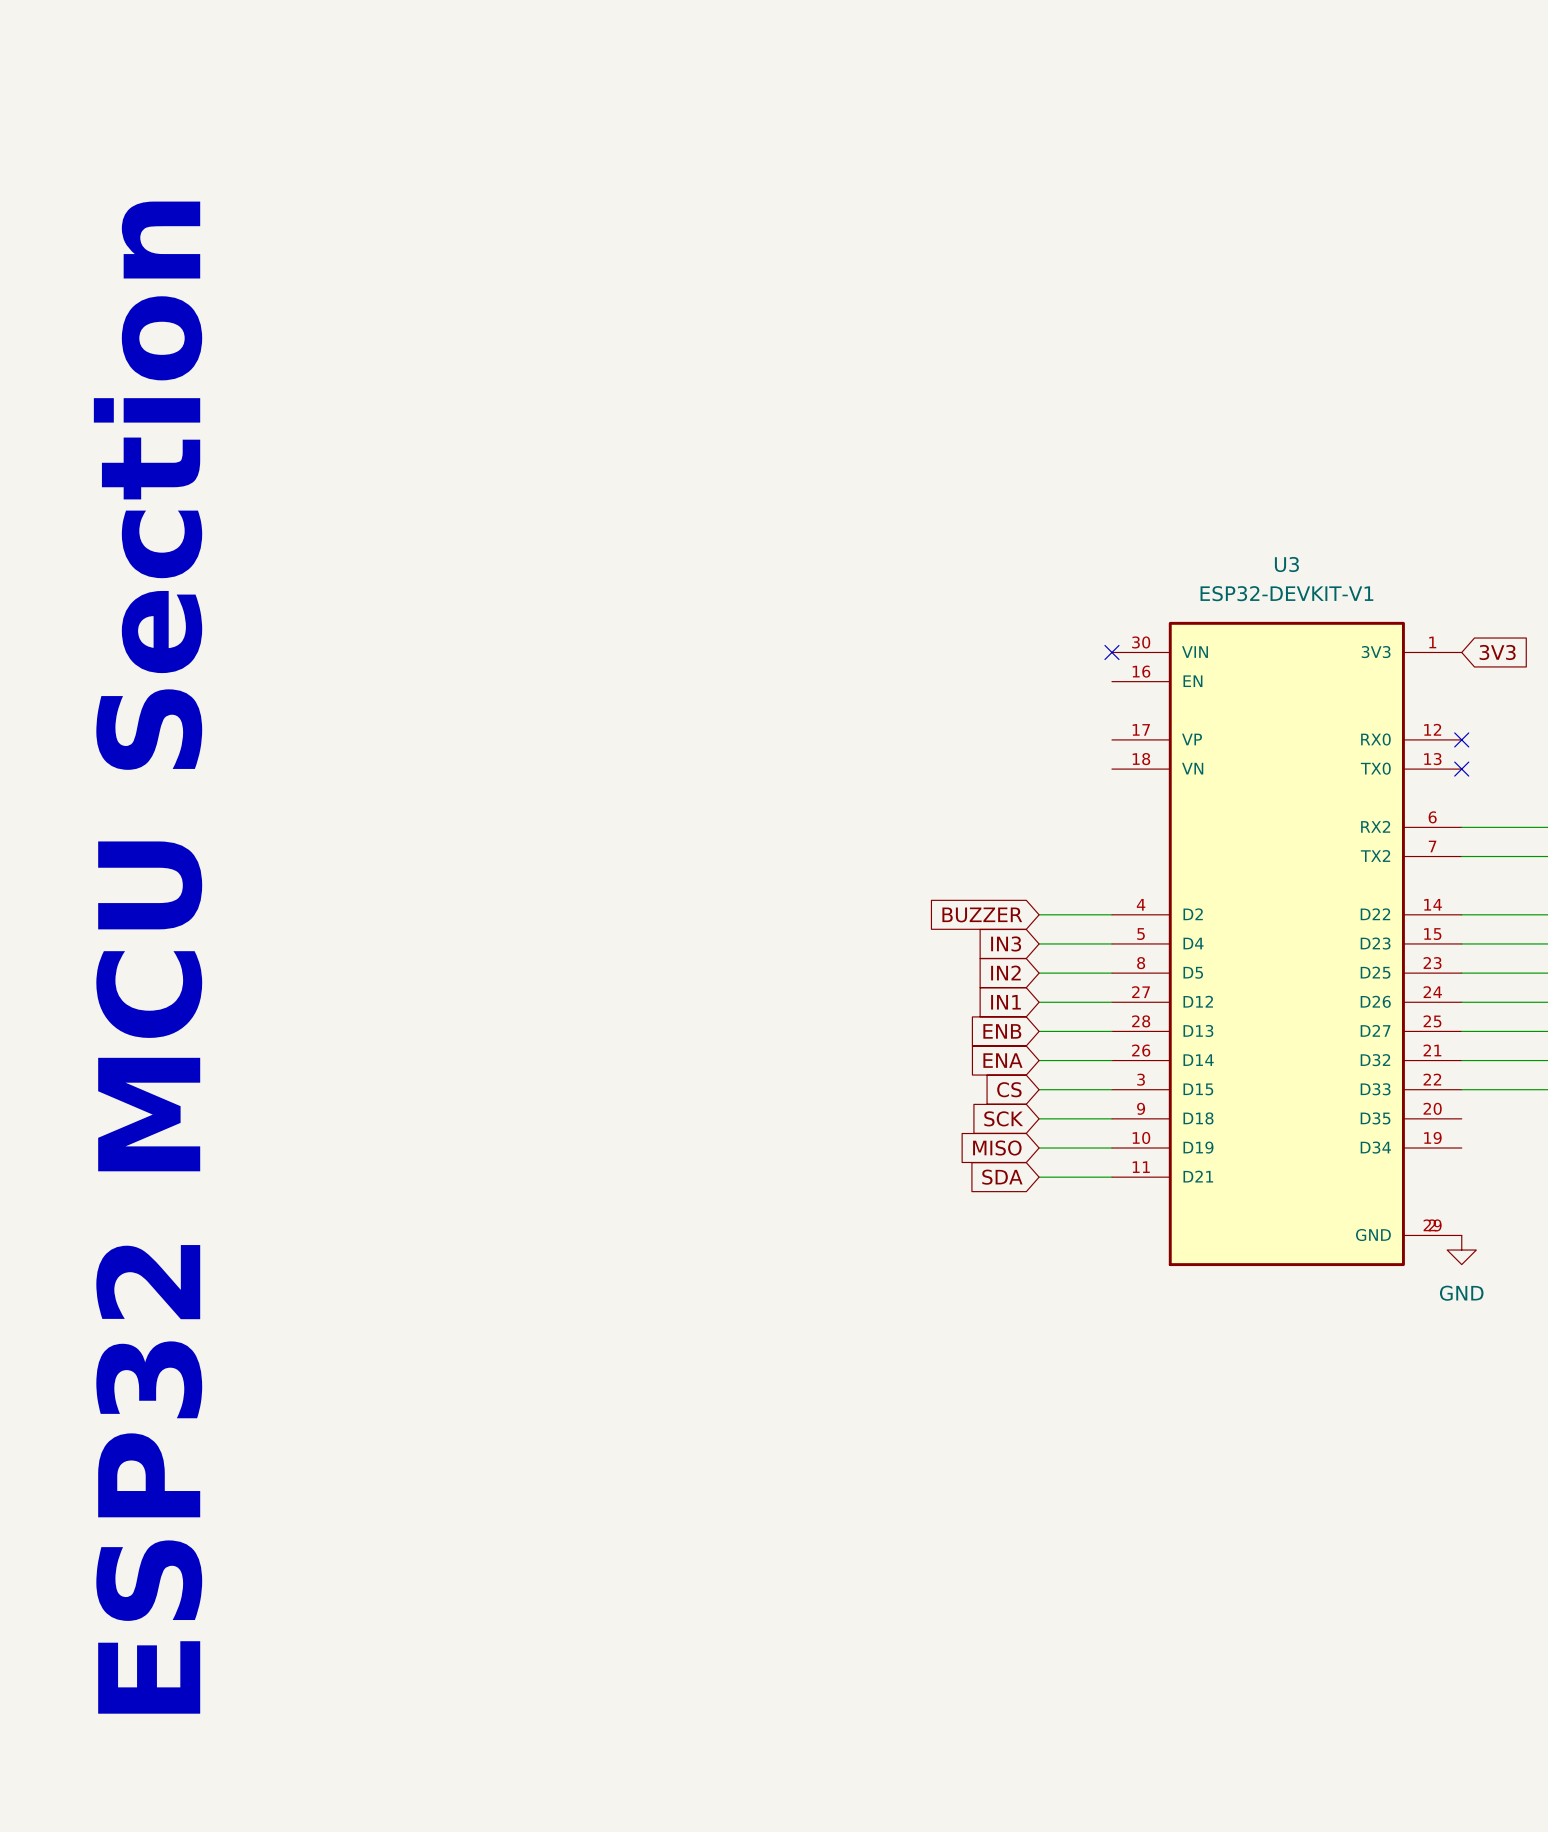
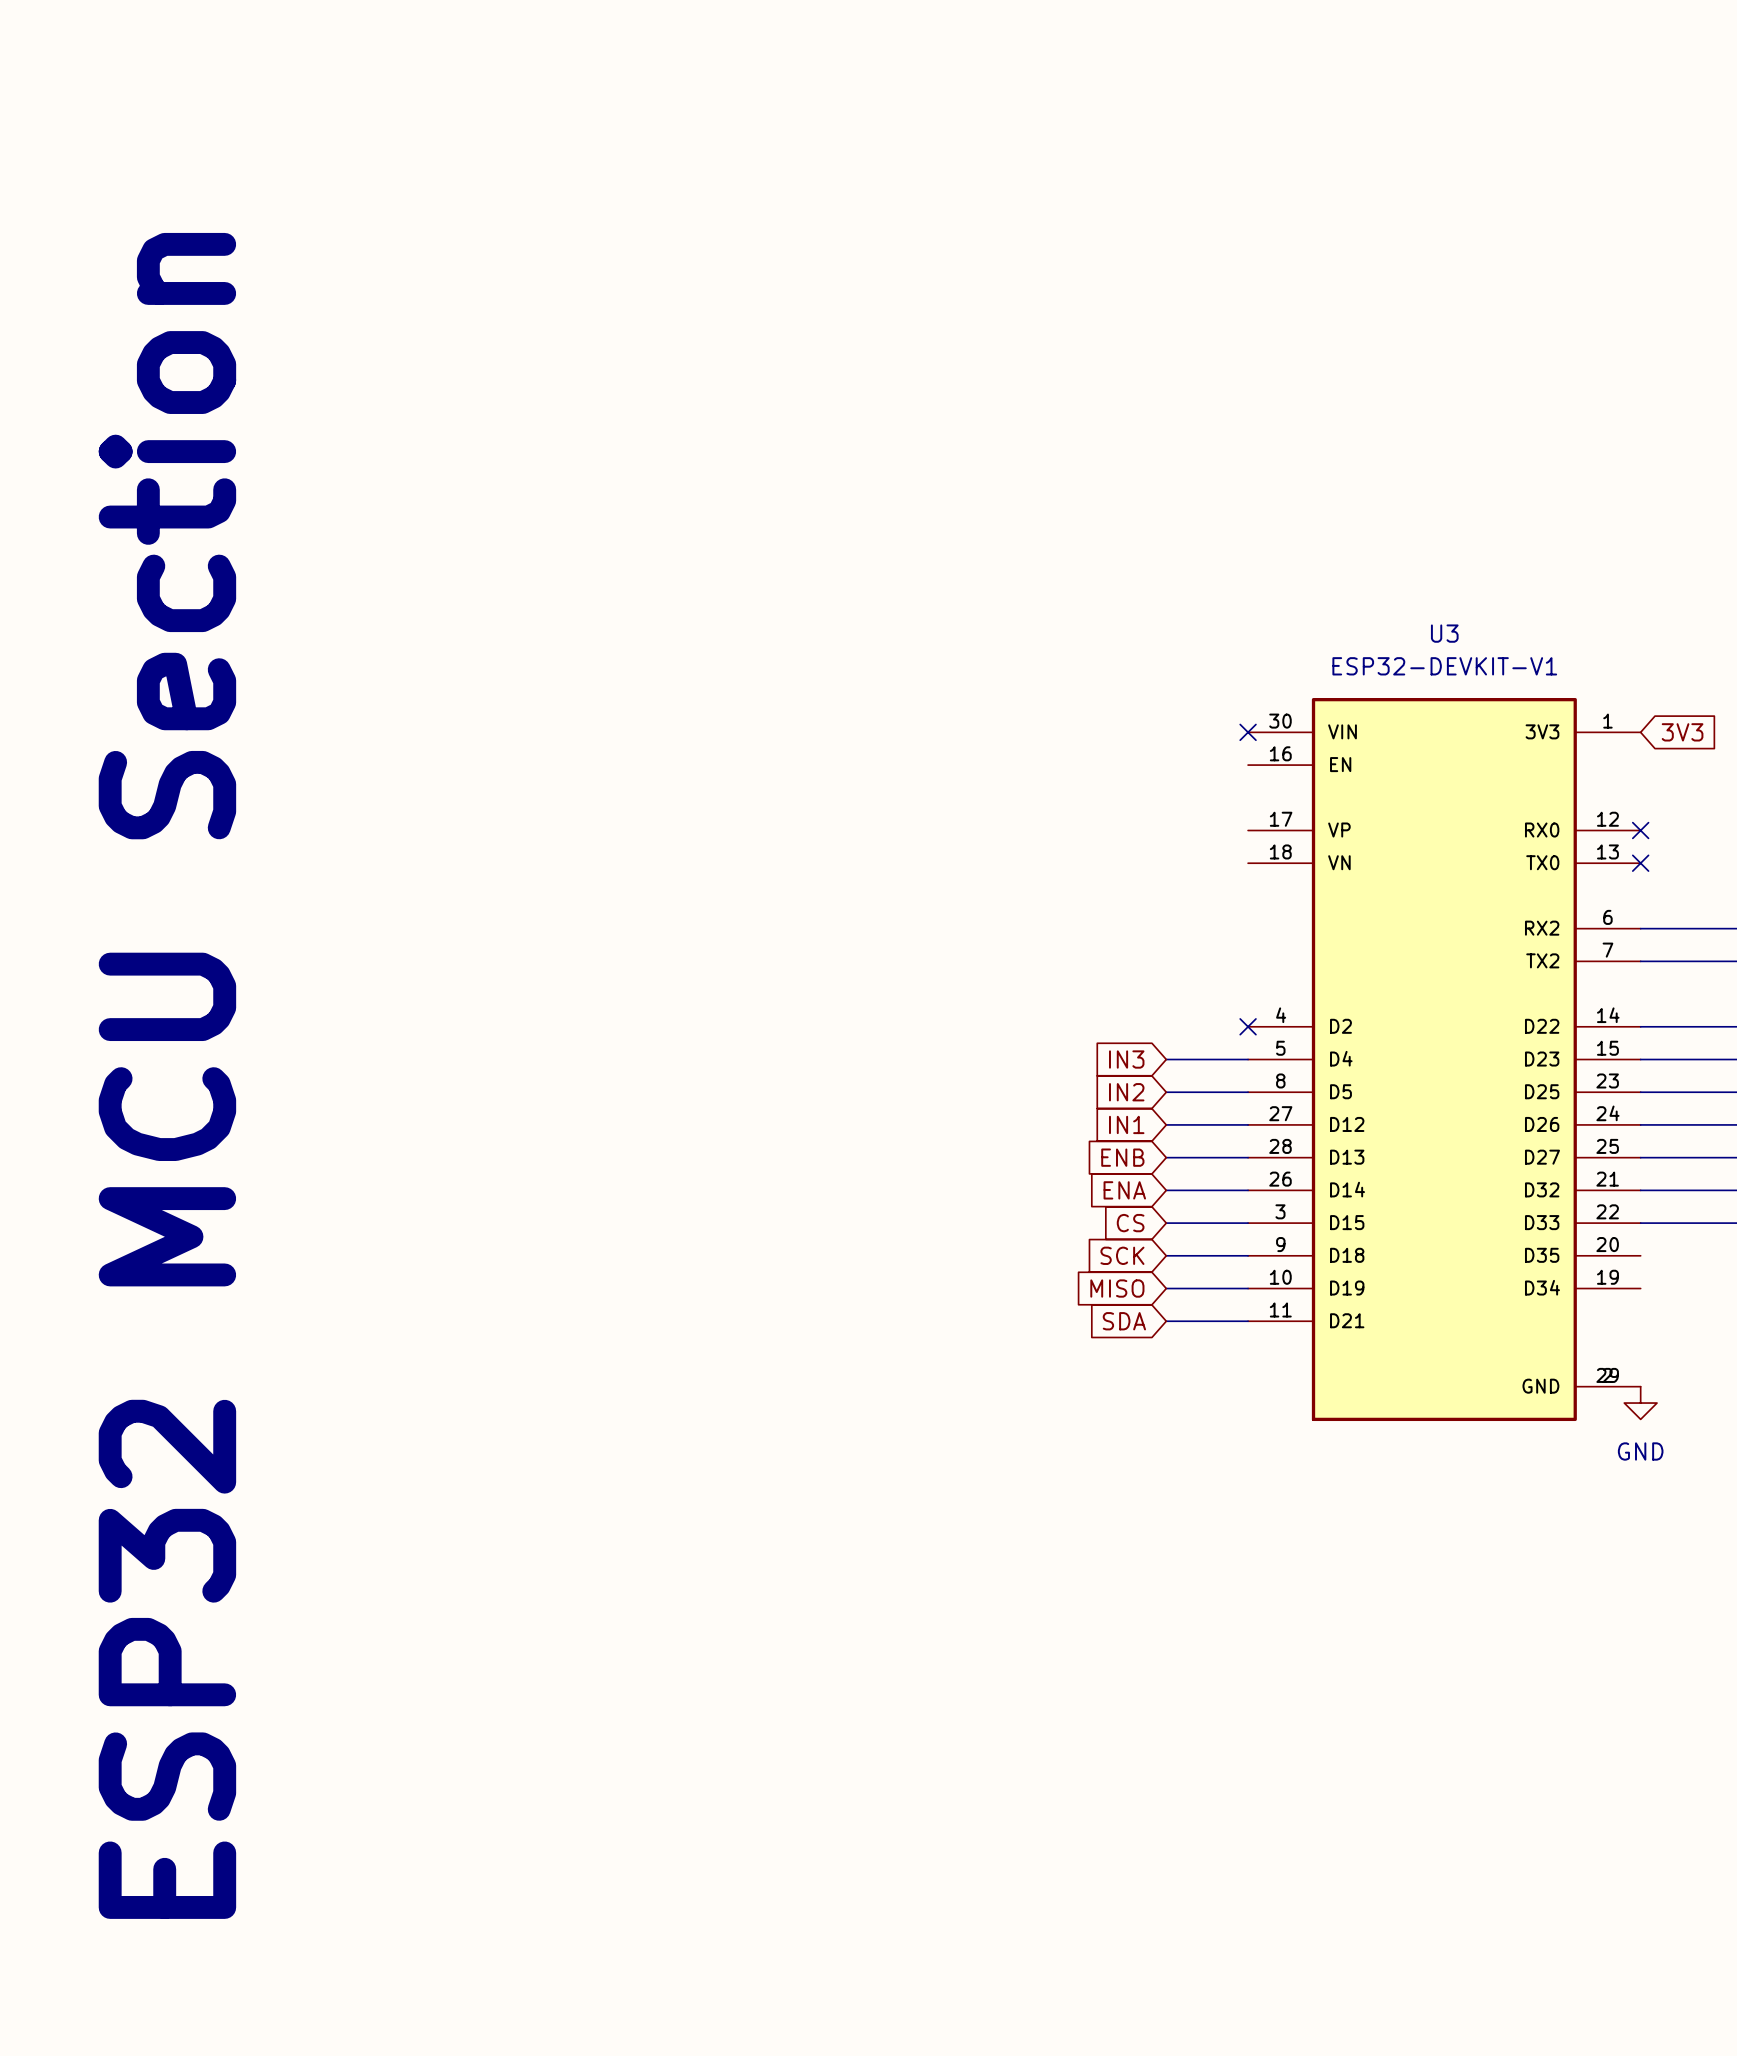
global label: BUZZER (982, 914) -> none
wire: (1039, 914) (1111, 914) -> none
no-connect mark: none -> (1248, 1026)

